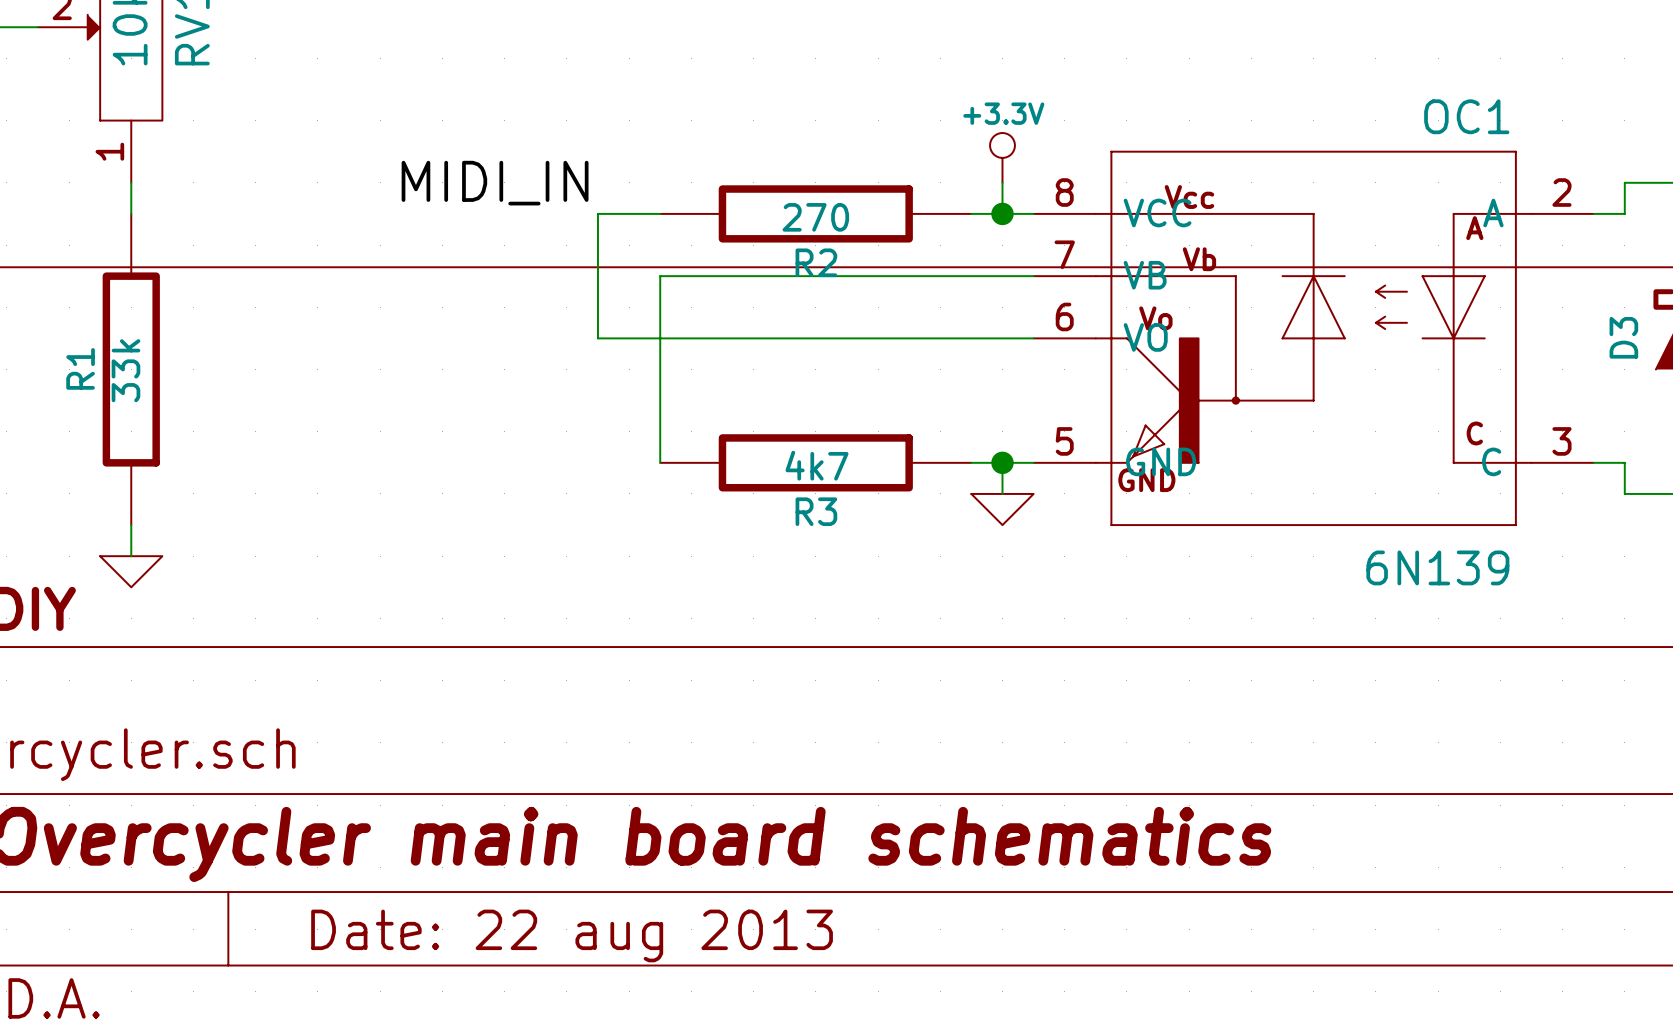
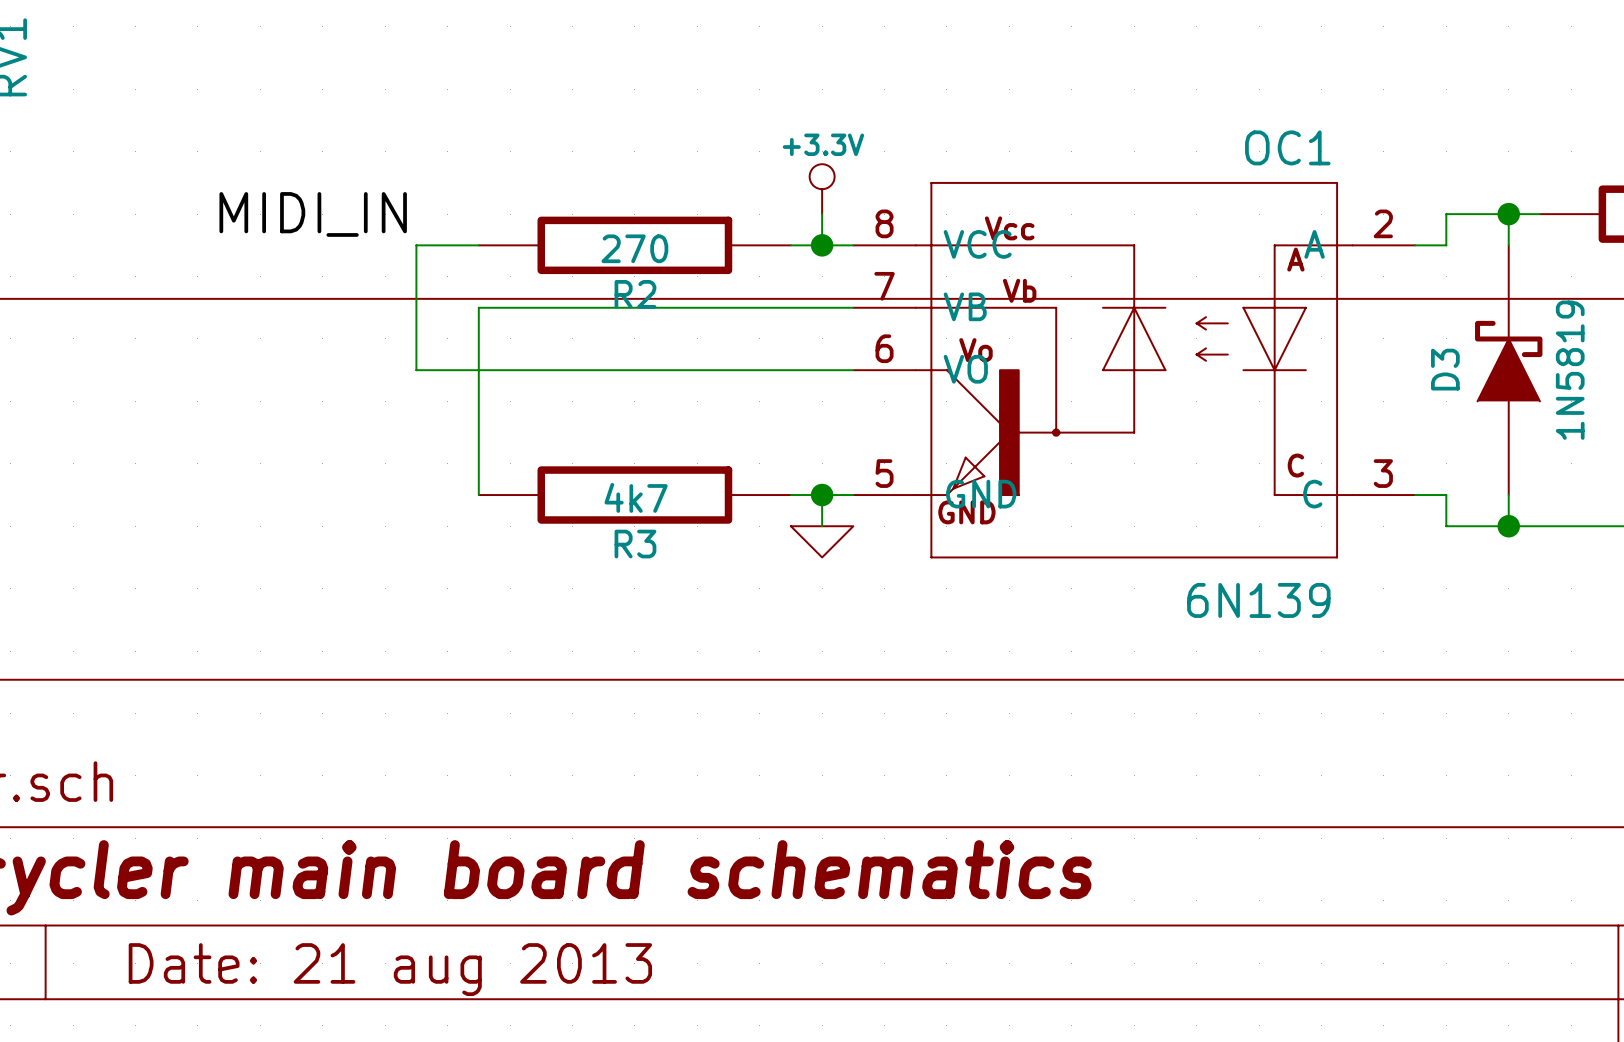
title block: Date: 22 aug 2013 (572, 935) -> Date: 21 aug 2013 (390, 969)

